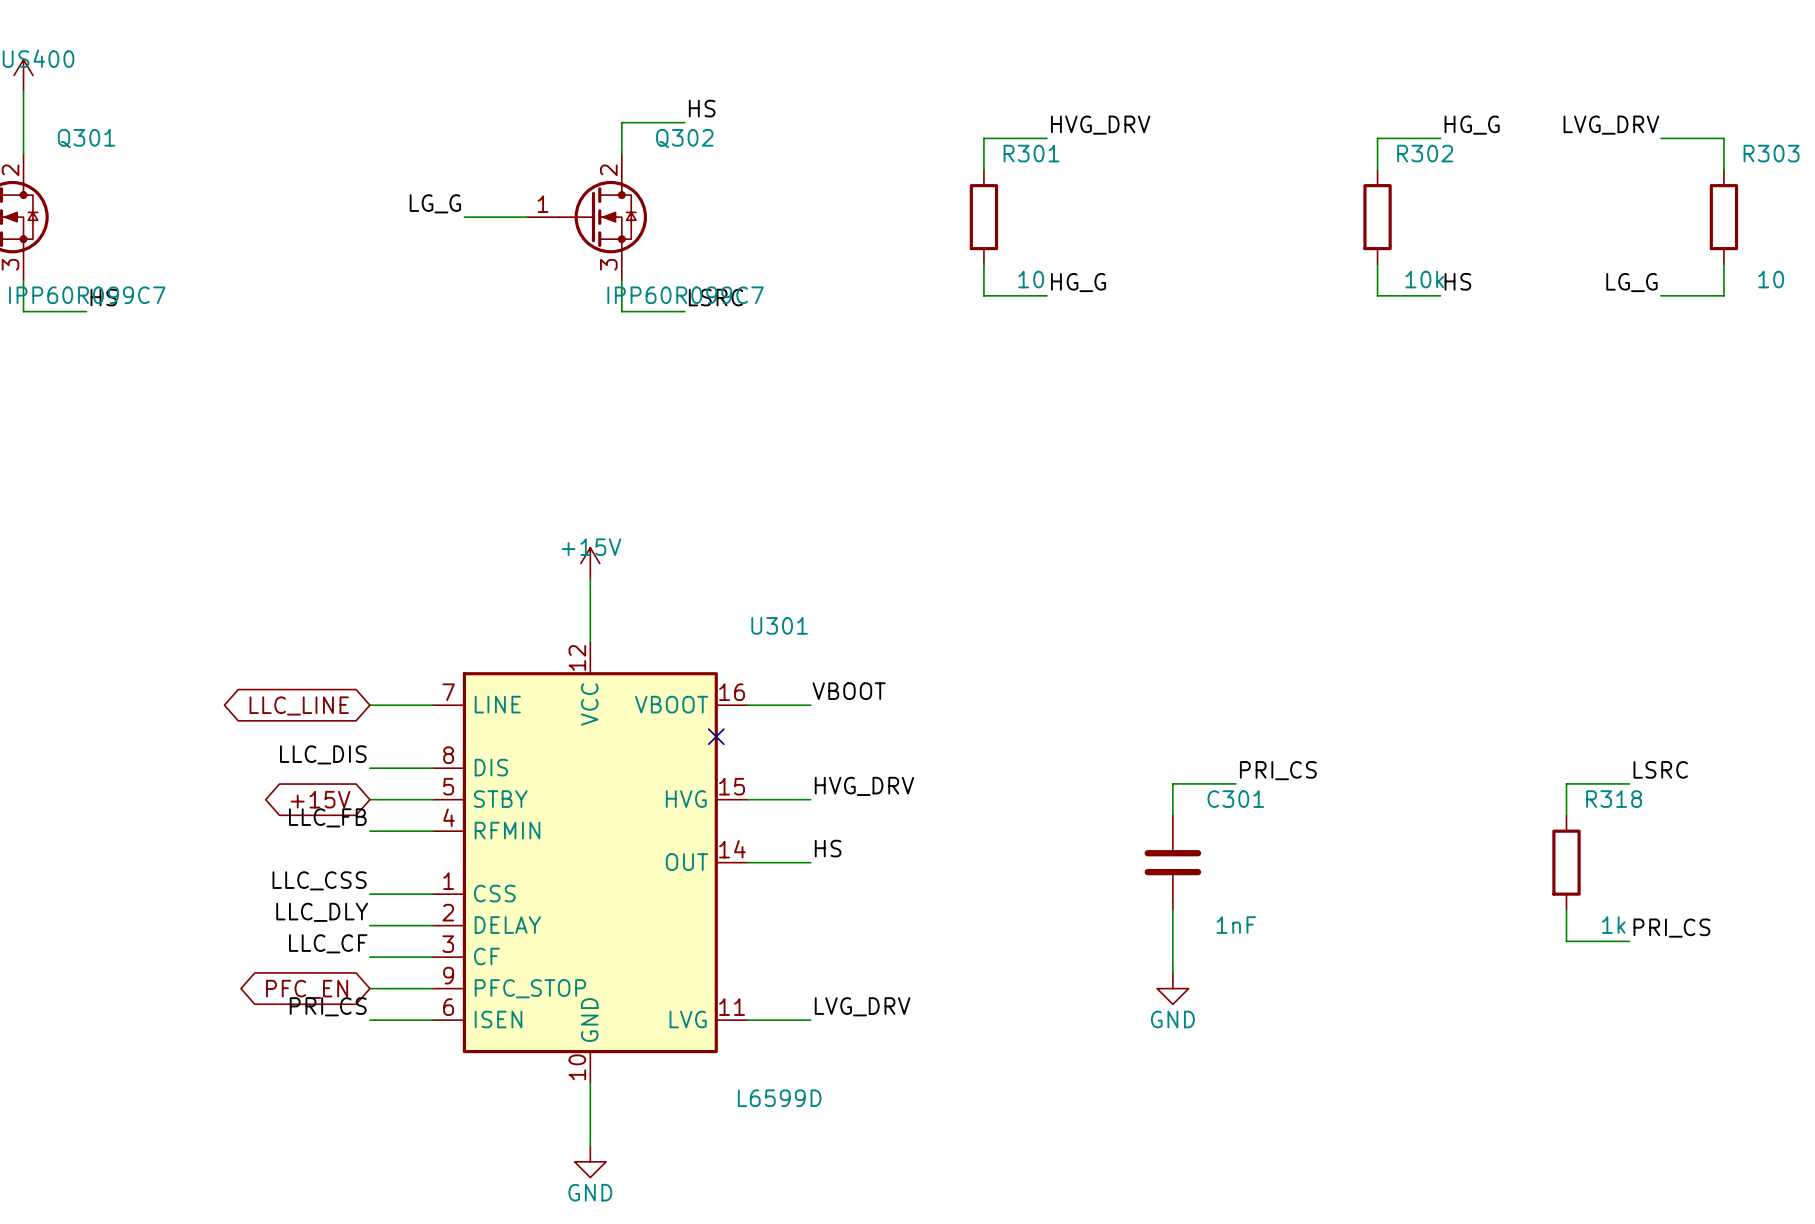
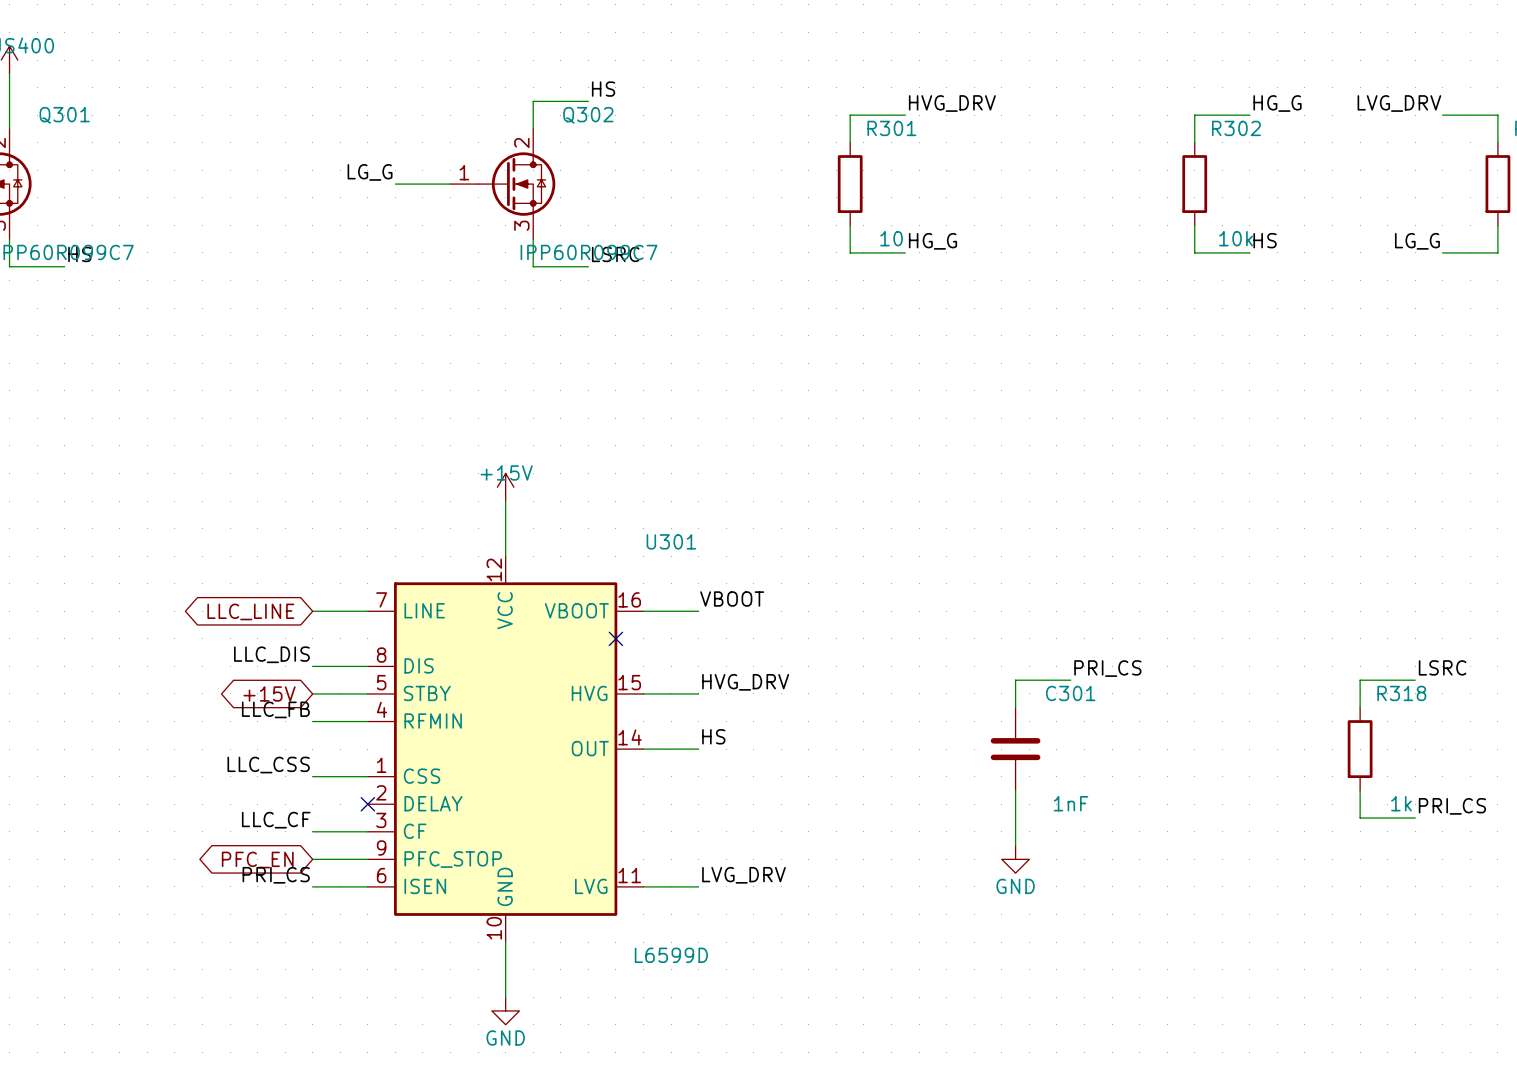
label: LLC_DLY (322, 912) -> none
wire: (369, 925) (432, 925) -> none
no-connect mark: none -> (367, 804)

